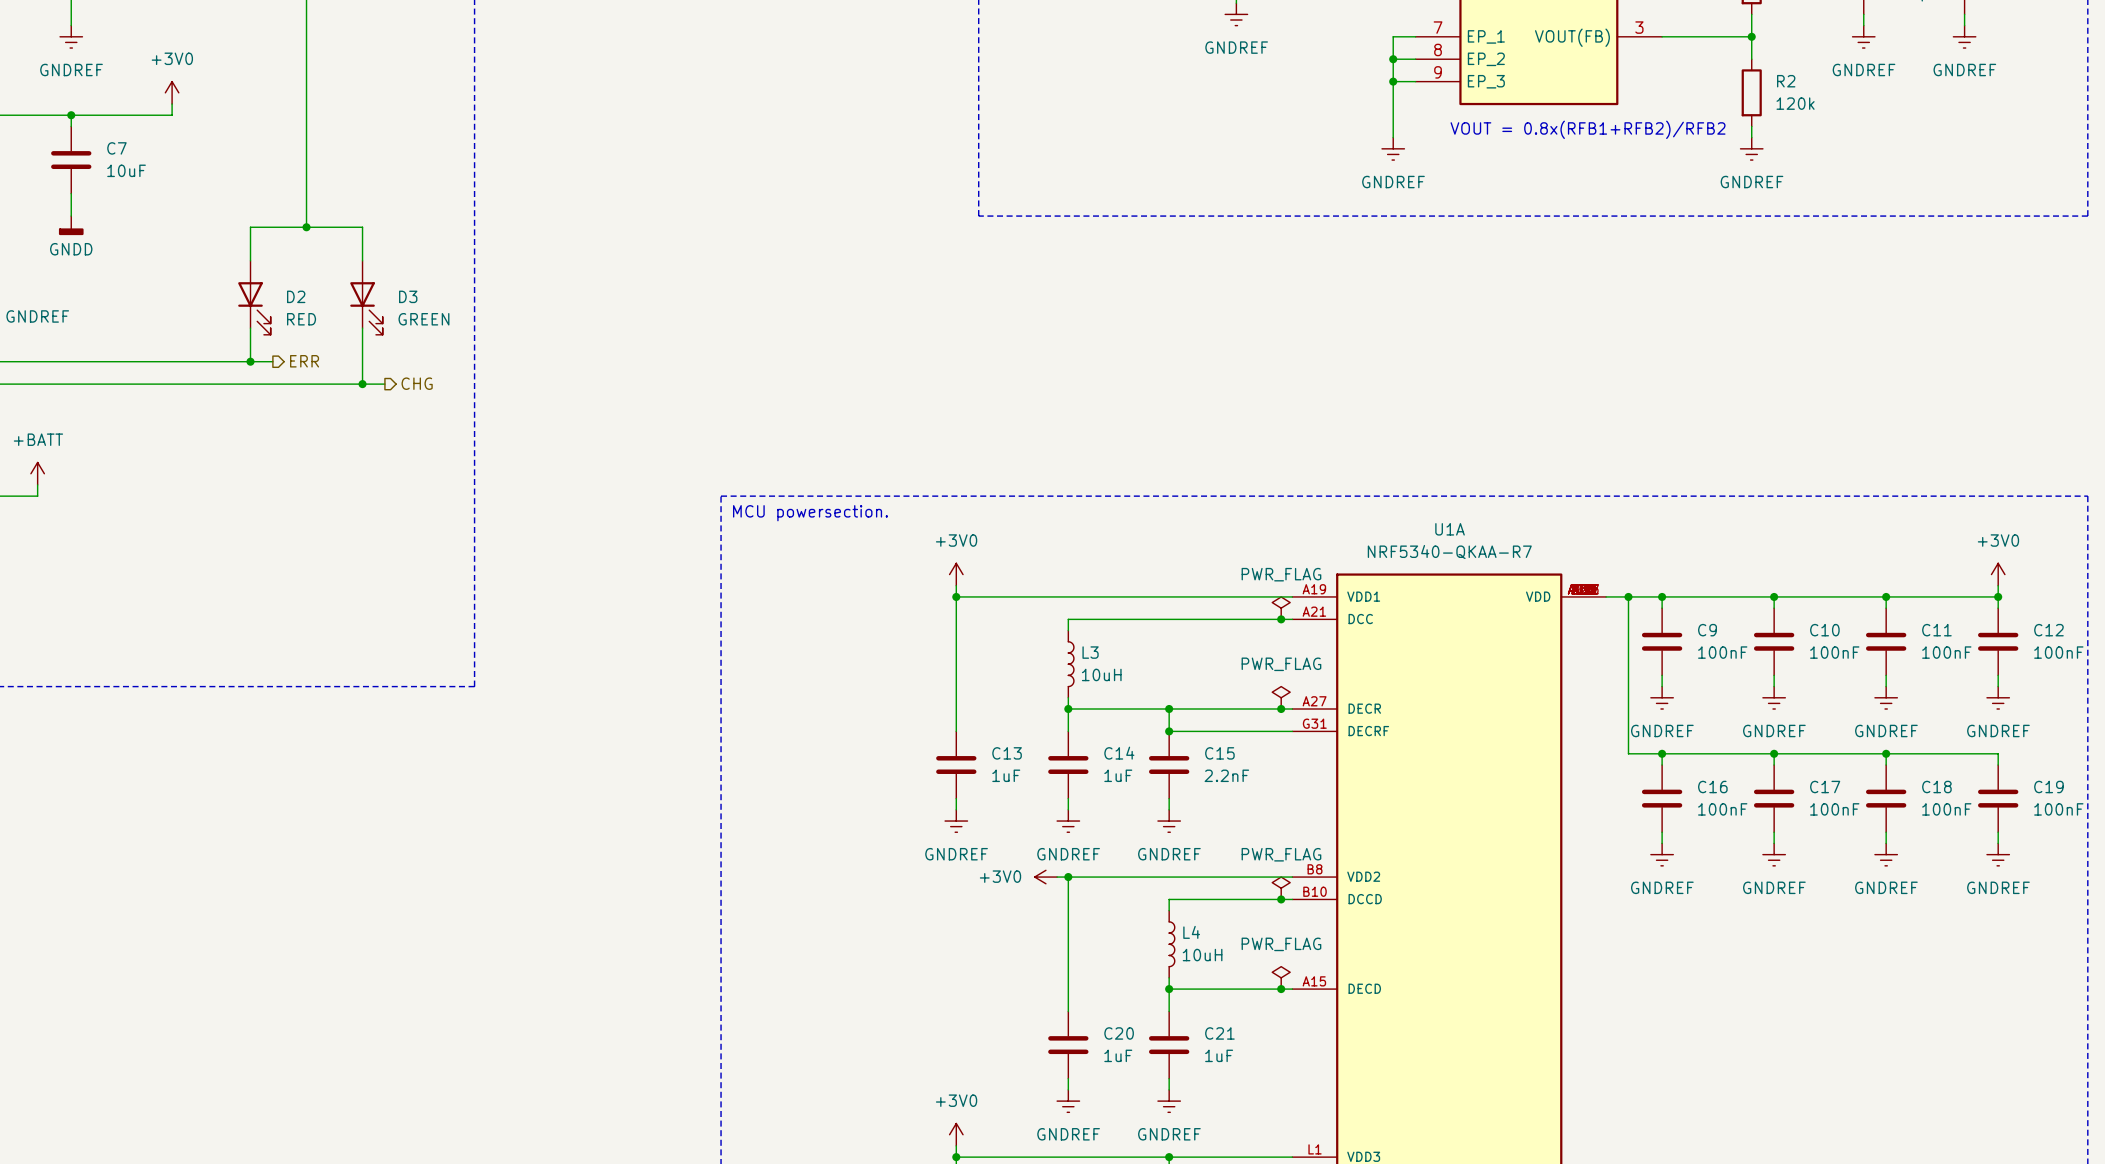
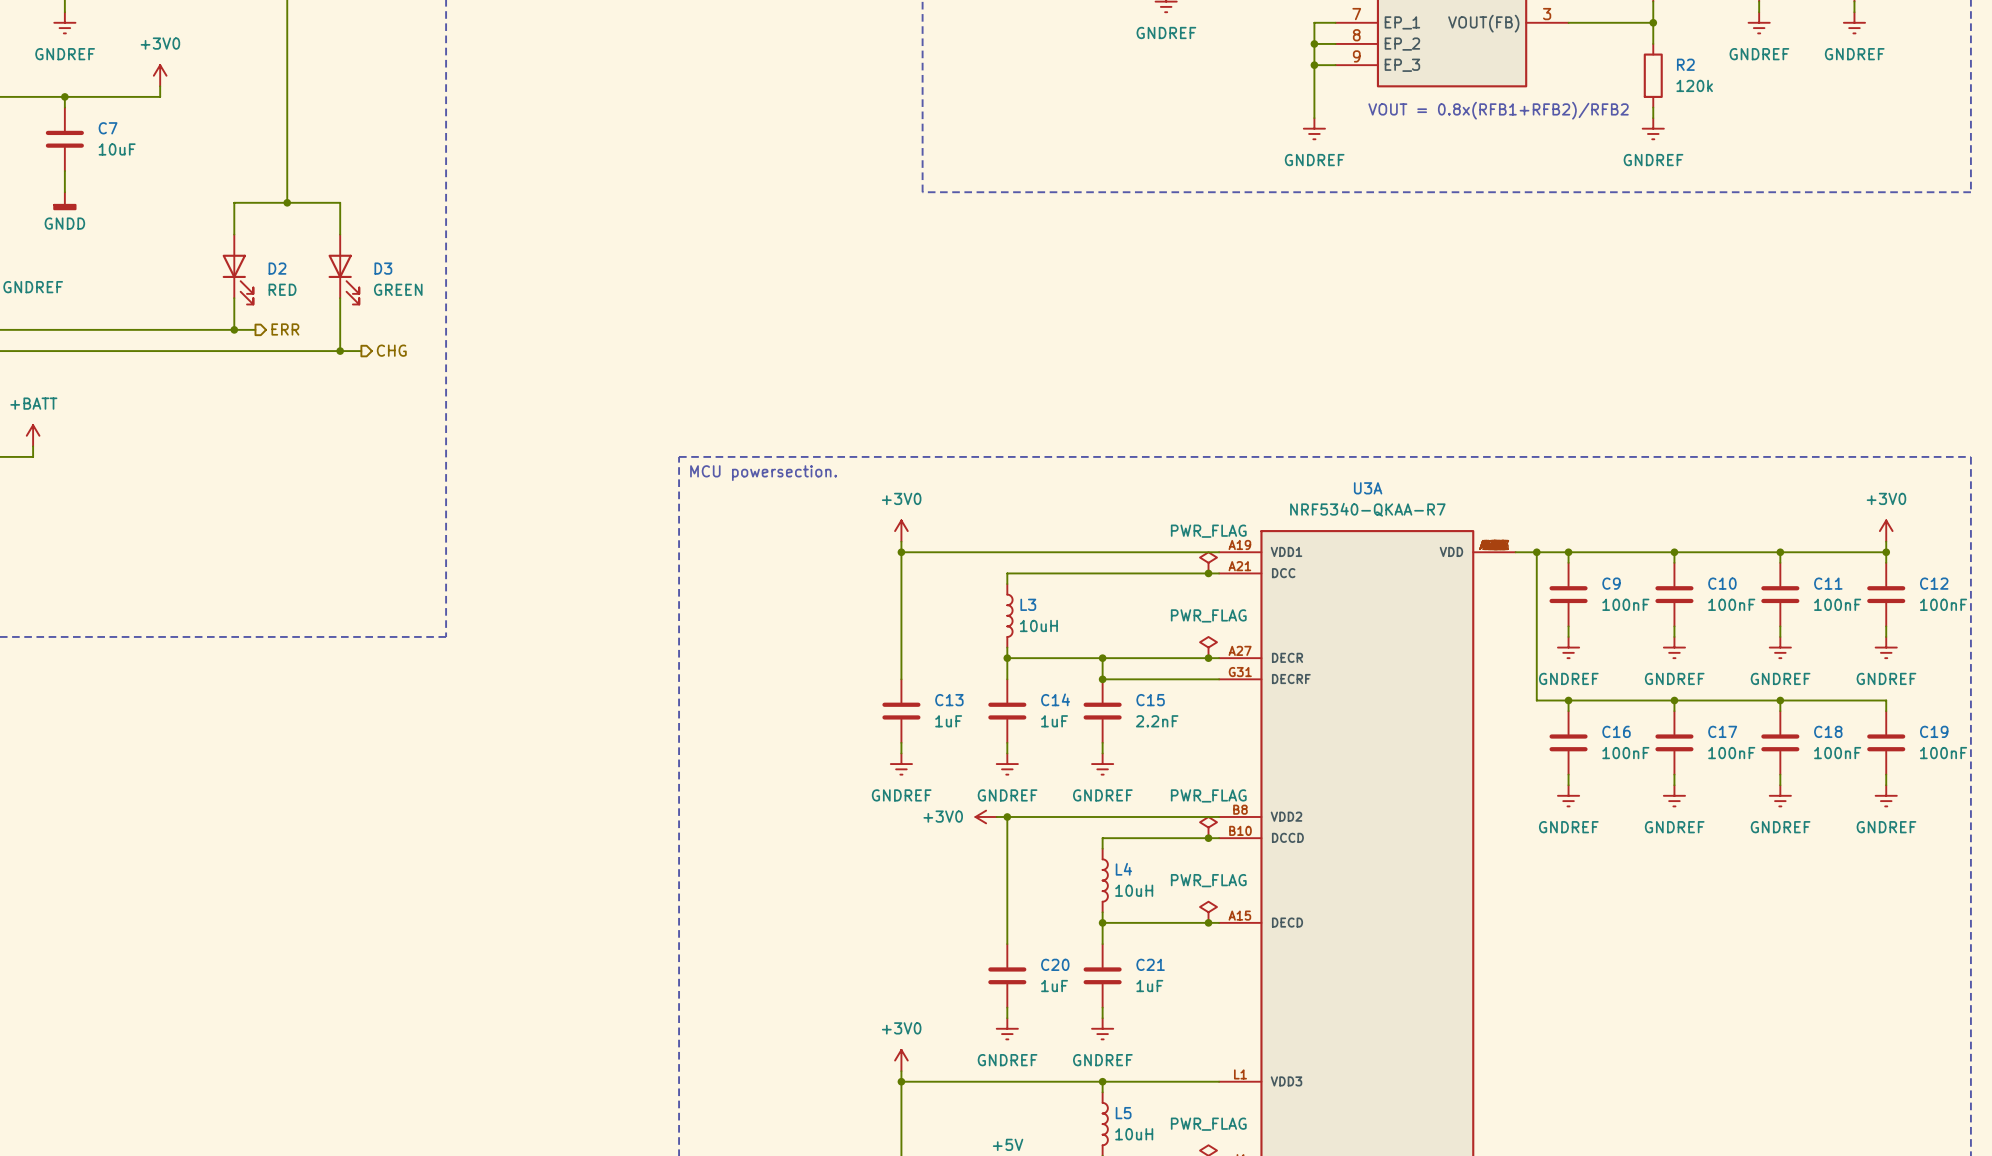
U1A name: U1A (1450, 529) -> U3A (1368, 488)

